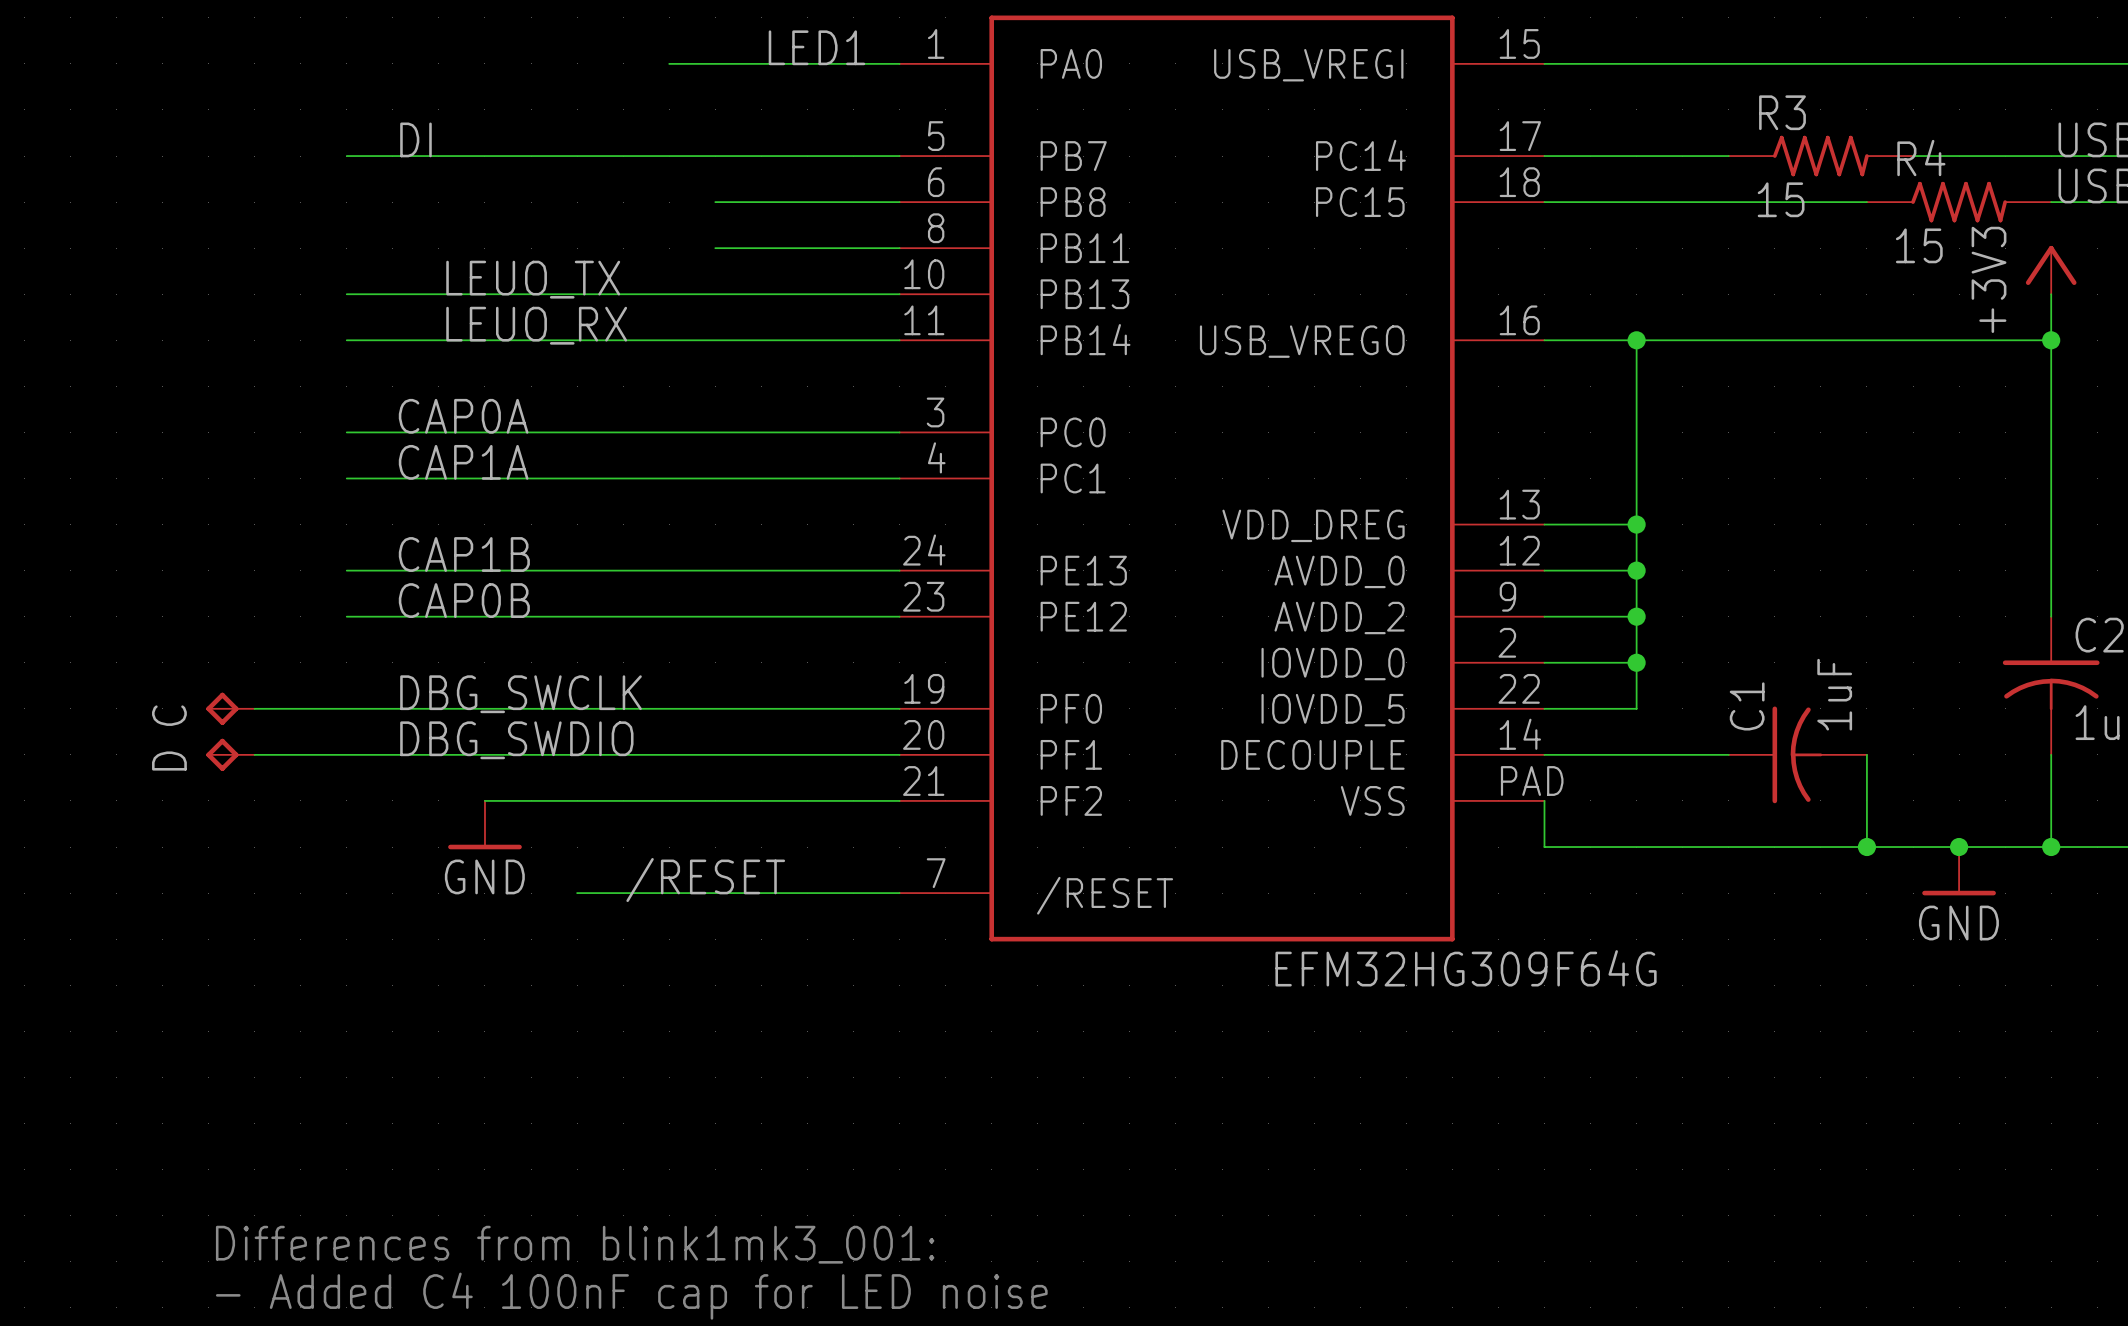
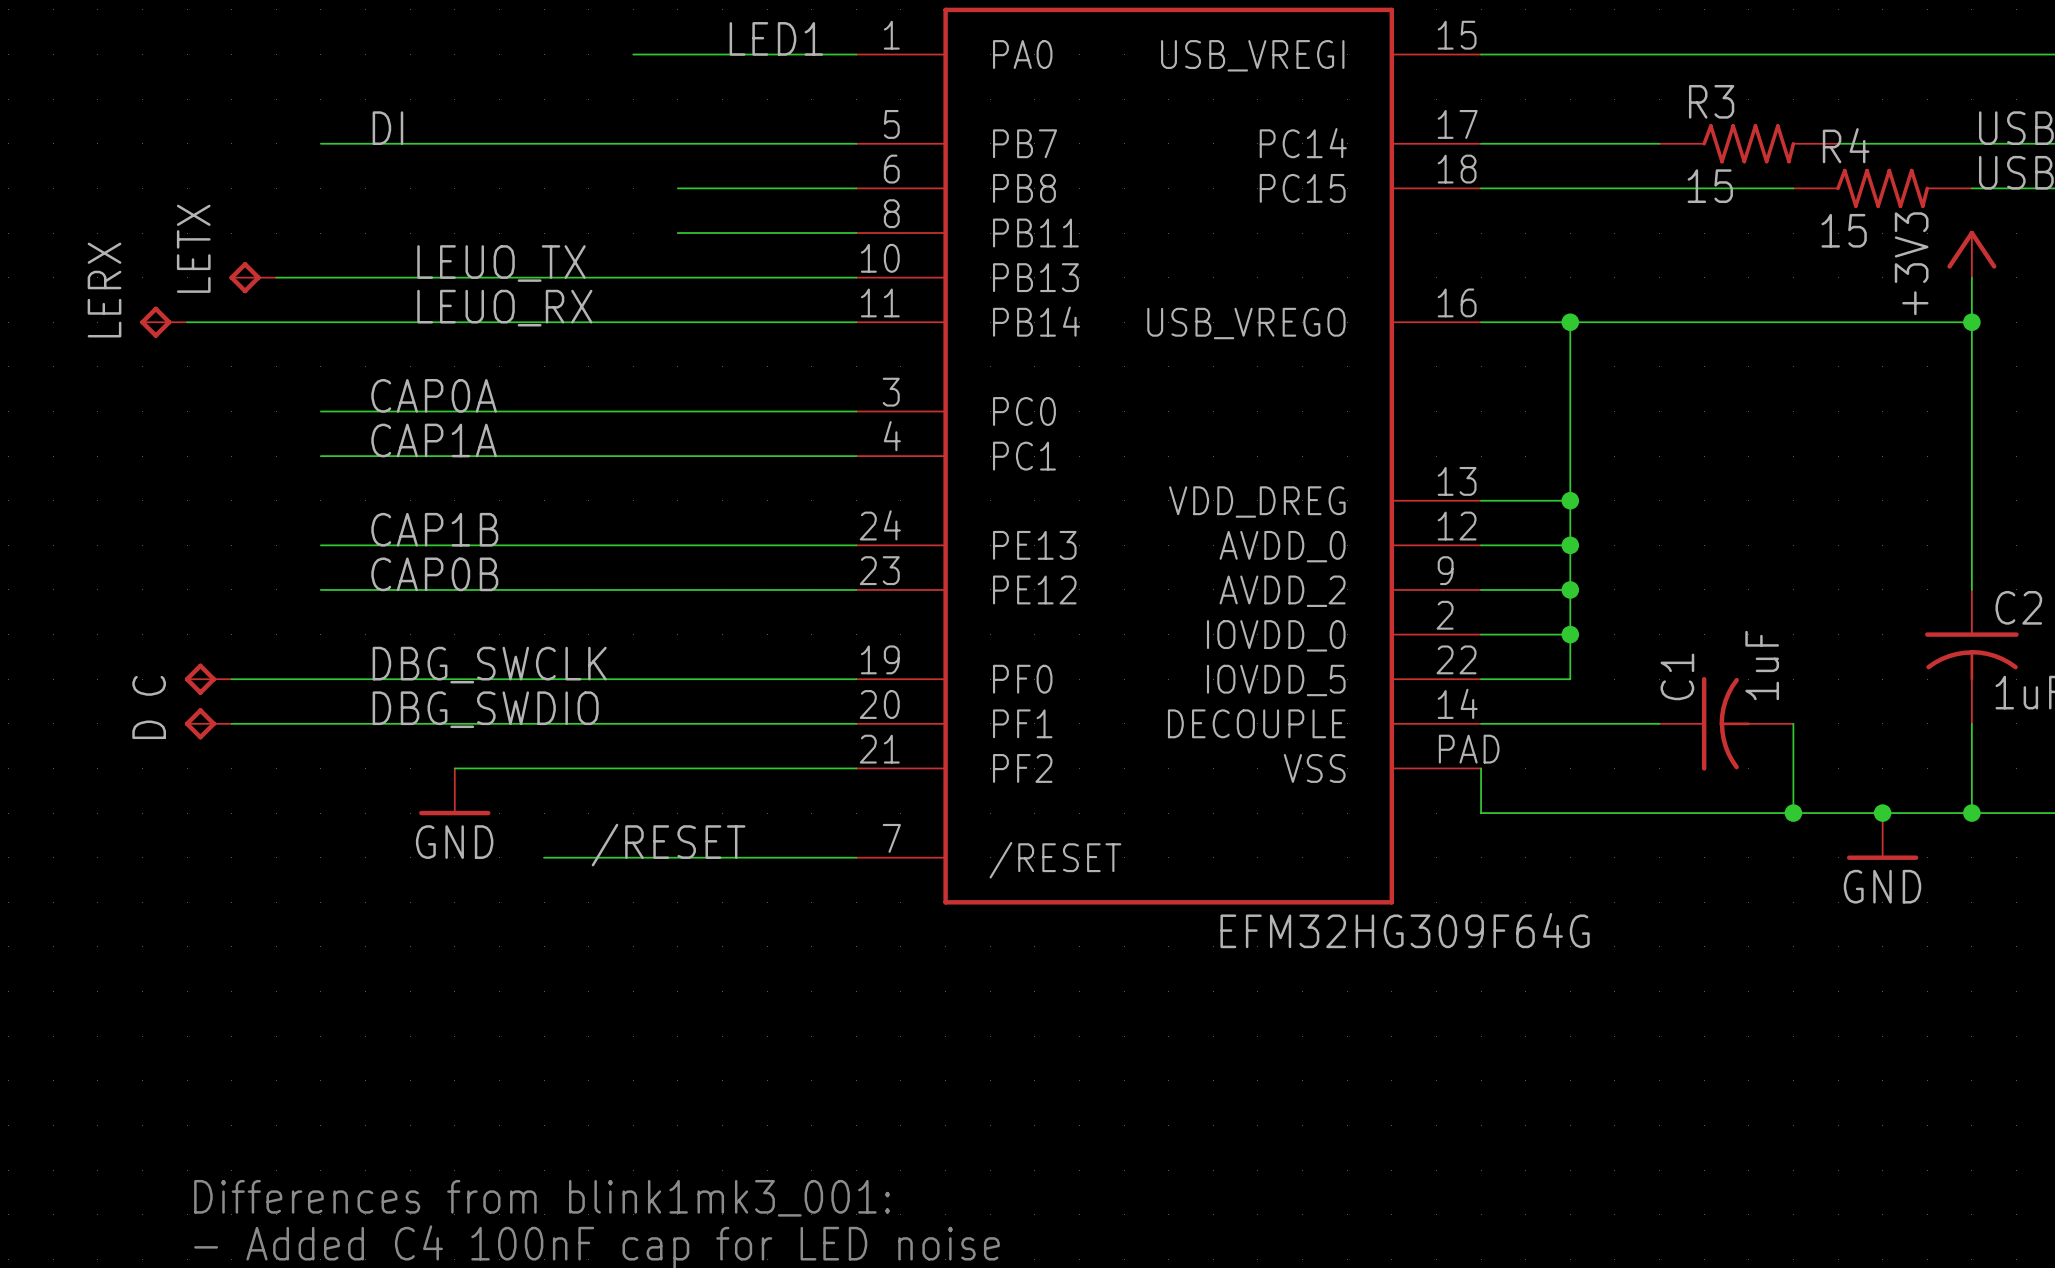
LETX: none -> (252, 277)
wire: none -> (276, 277) (320, 277)
LERX: none -> (163, 322)
wire: none -> (187, 322) (320, 322)

